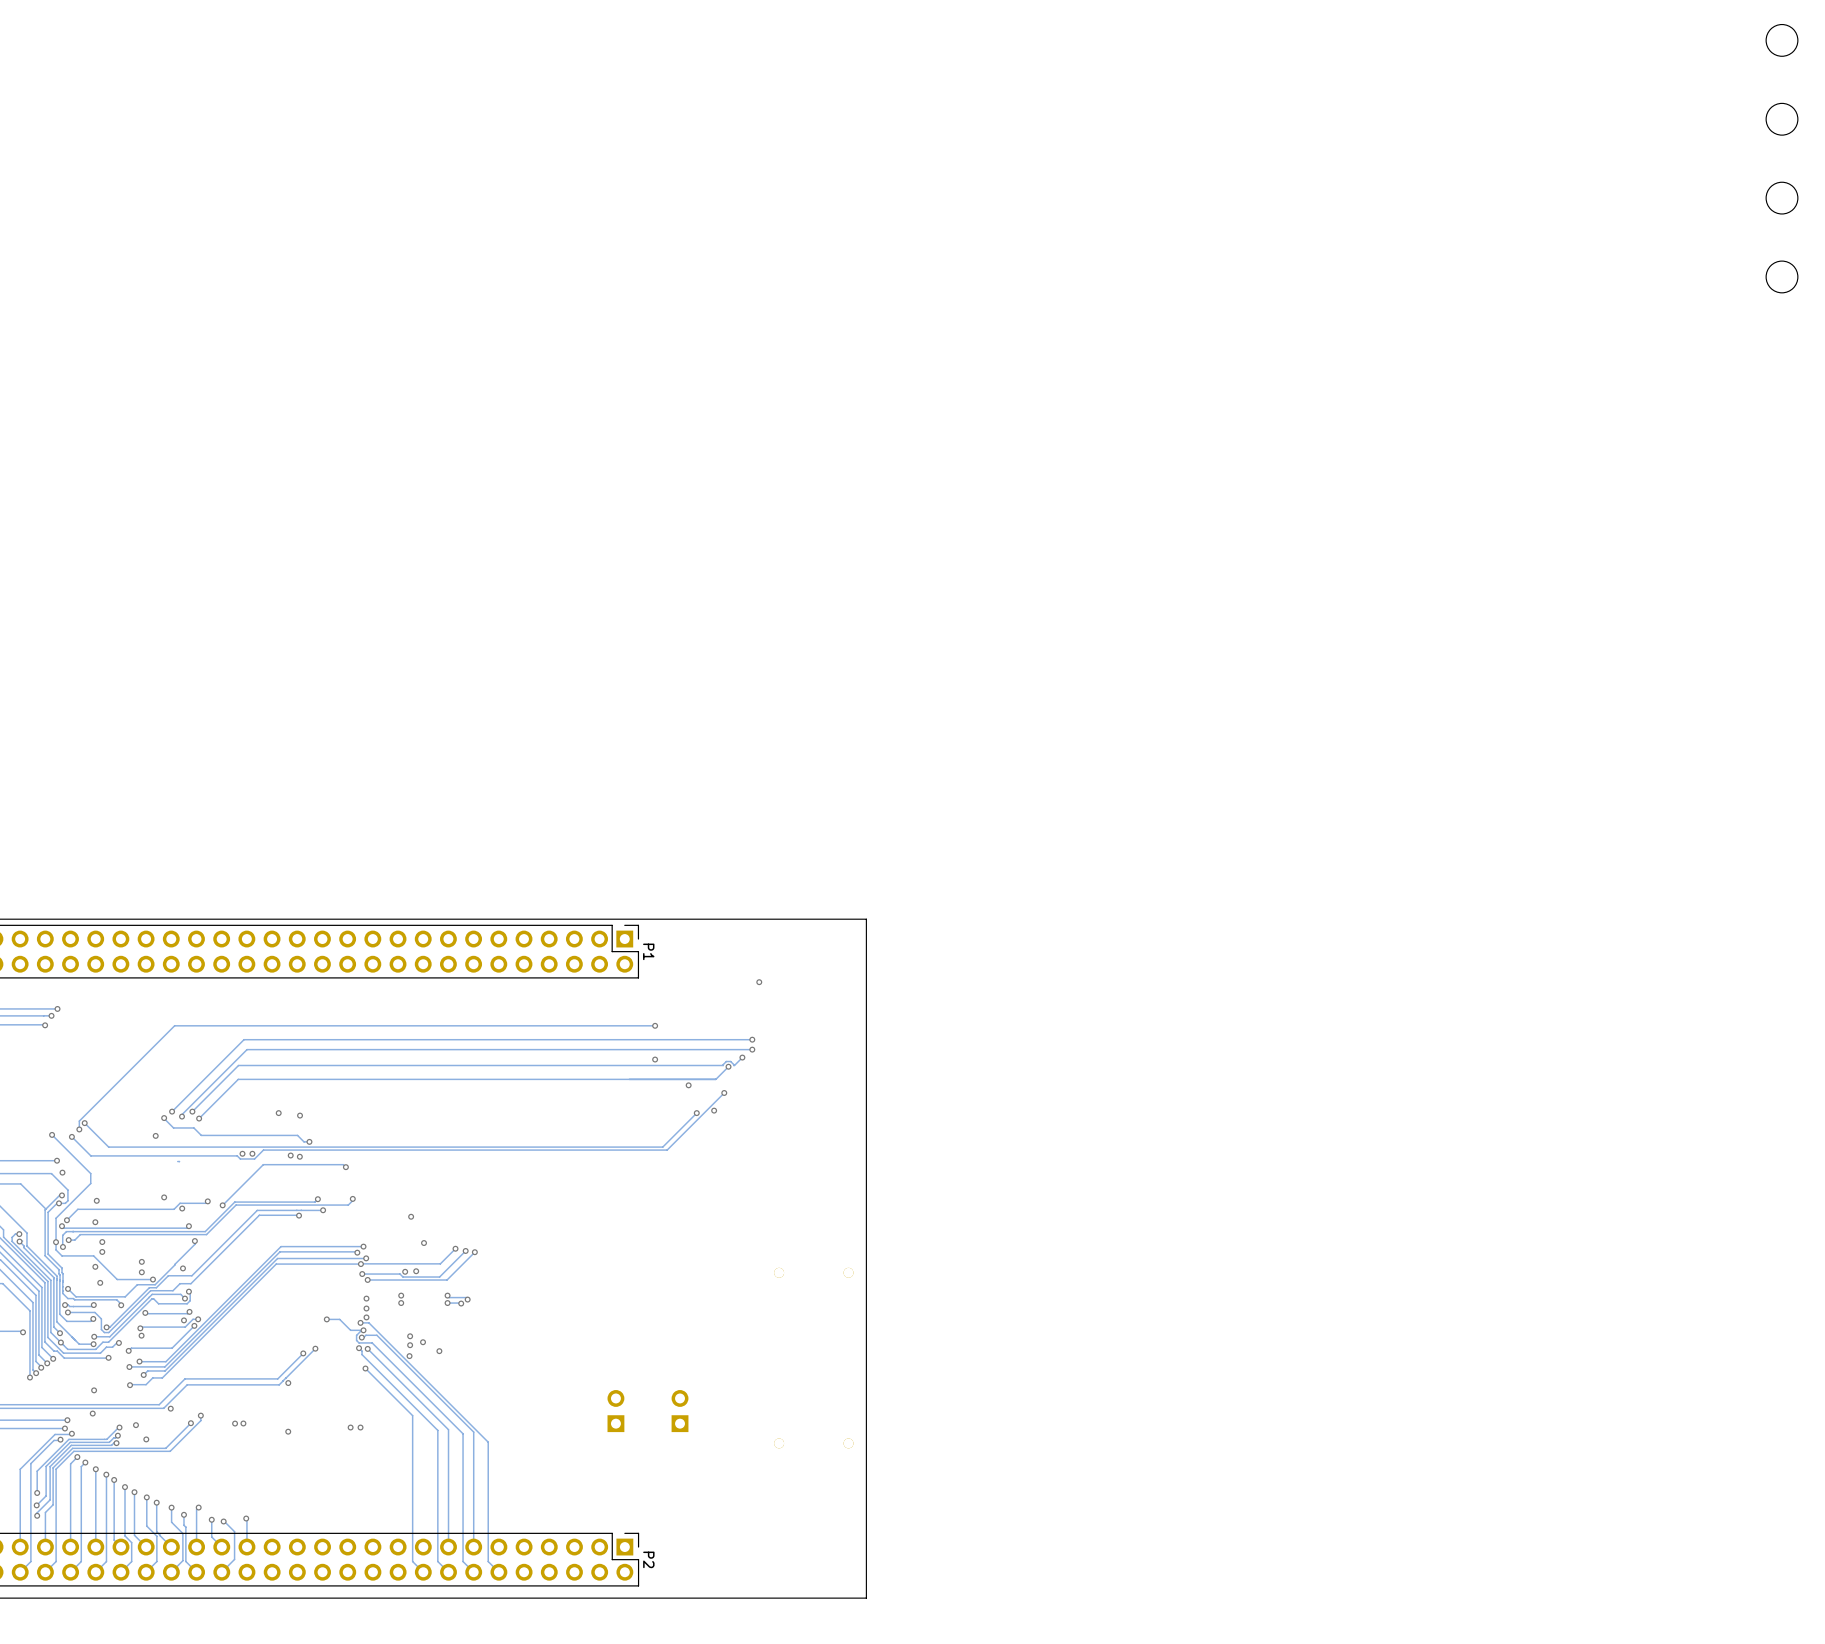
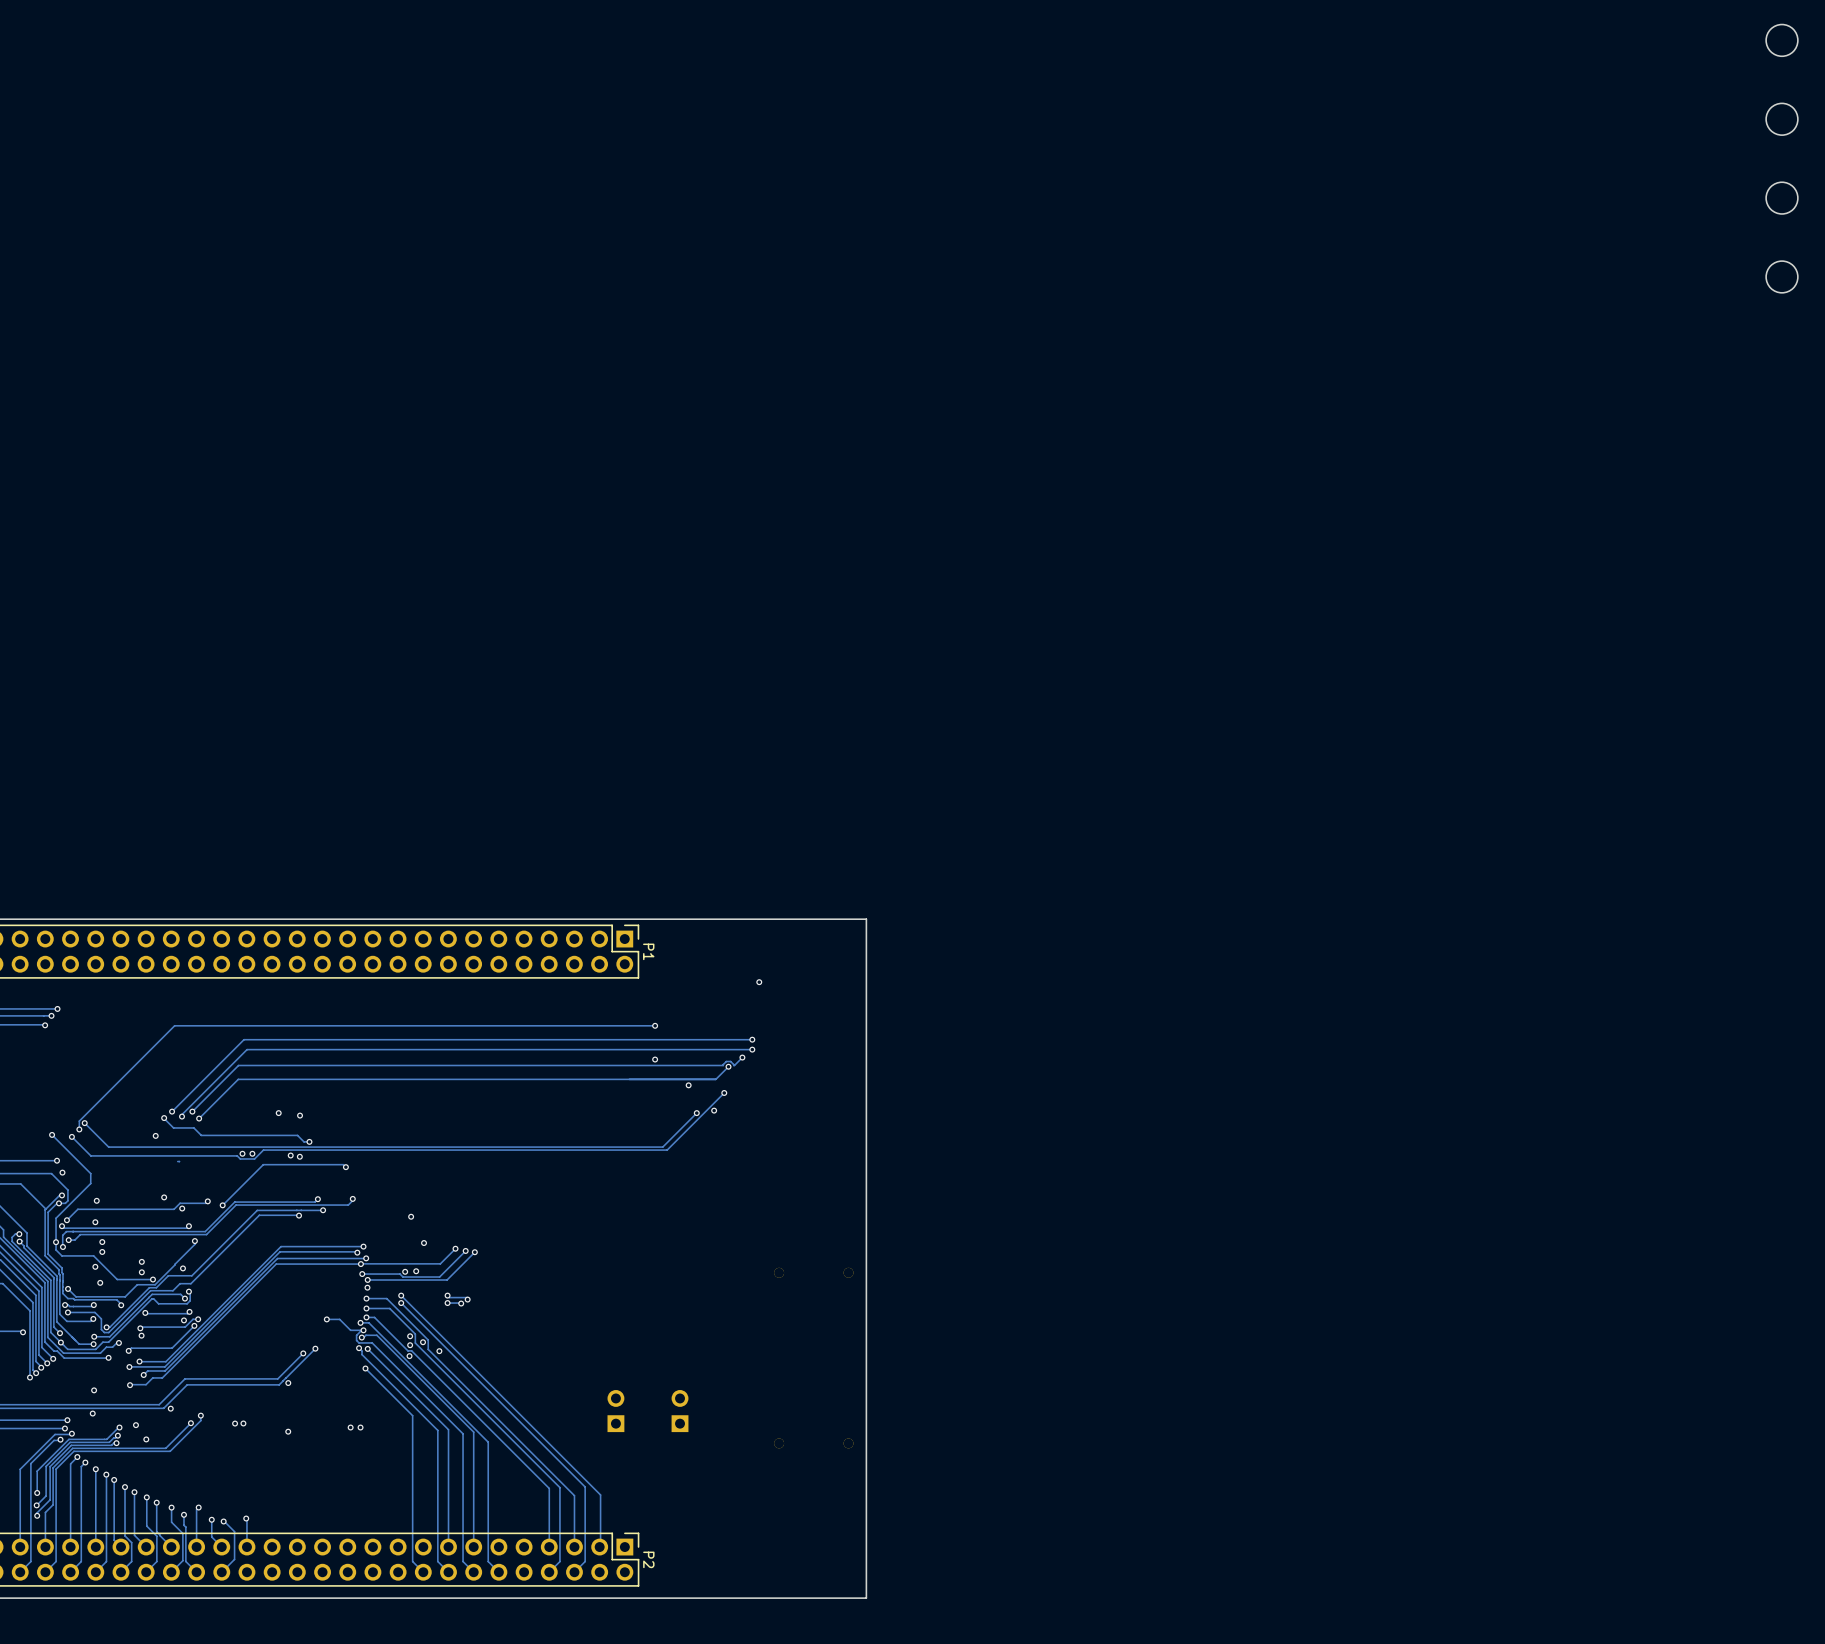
via: none -> (367, 1287)
track: none -> (401, 1295) (600, 1494) (599, 1547)
track: none -> (366, 1298) (386, 1298) (428, 1340) (428, 1349) (574, 1495) (574, 1547)
track: none -> (401, 1303) (585, 1486) (585, 1561) (574, 1572)
track: none -> (366, 1308) (389, 1308) (415, 1334) (415, 1343) (559, 1487) (559, 1561) (549, 1572)
track: none -> (366, 1317) (374, 1317) (407, 1350) (411, 1350) (549, 1488) (549, 1547)

